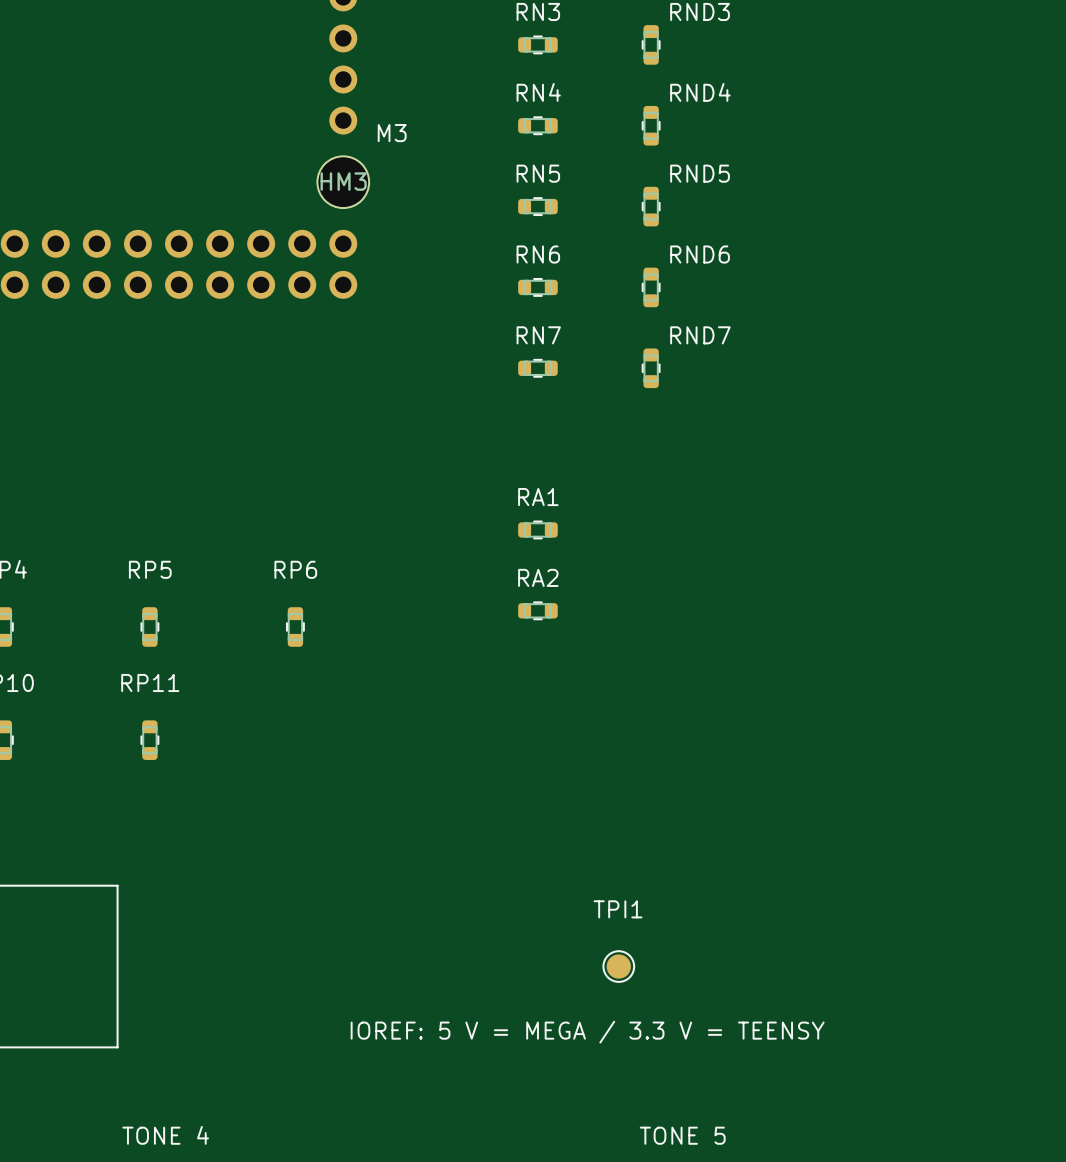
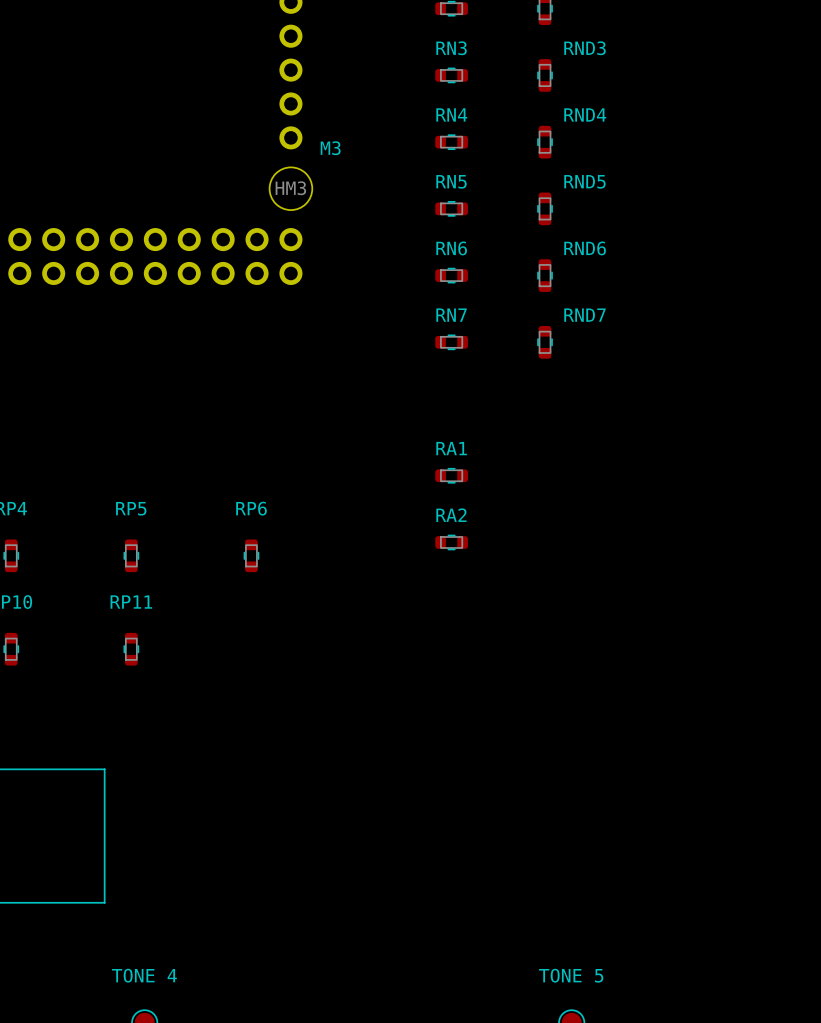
TPI1: (618, 966) -> none
text: IOREF: 5 V = MEGA / 3.3 V = TEENSY (587, 1032) -> none

